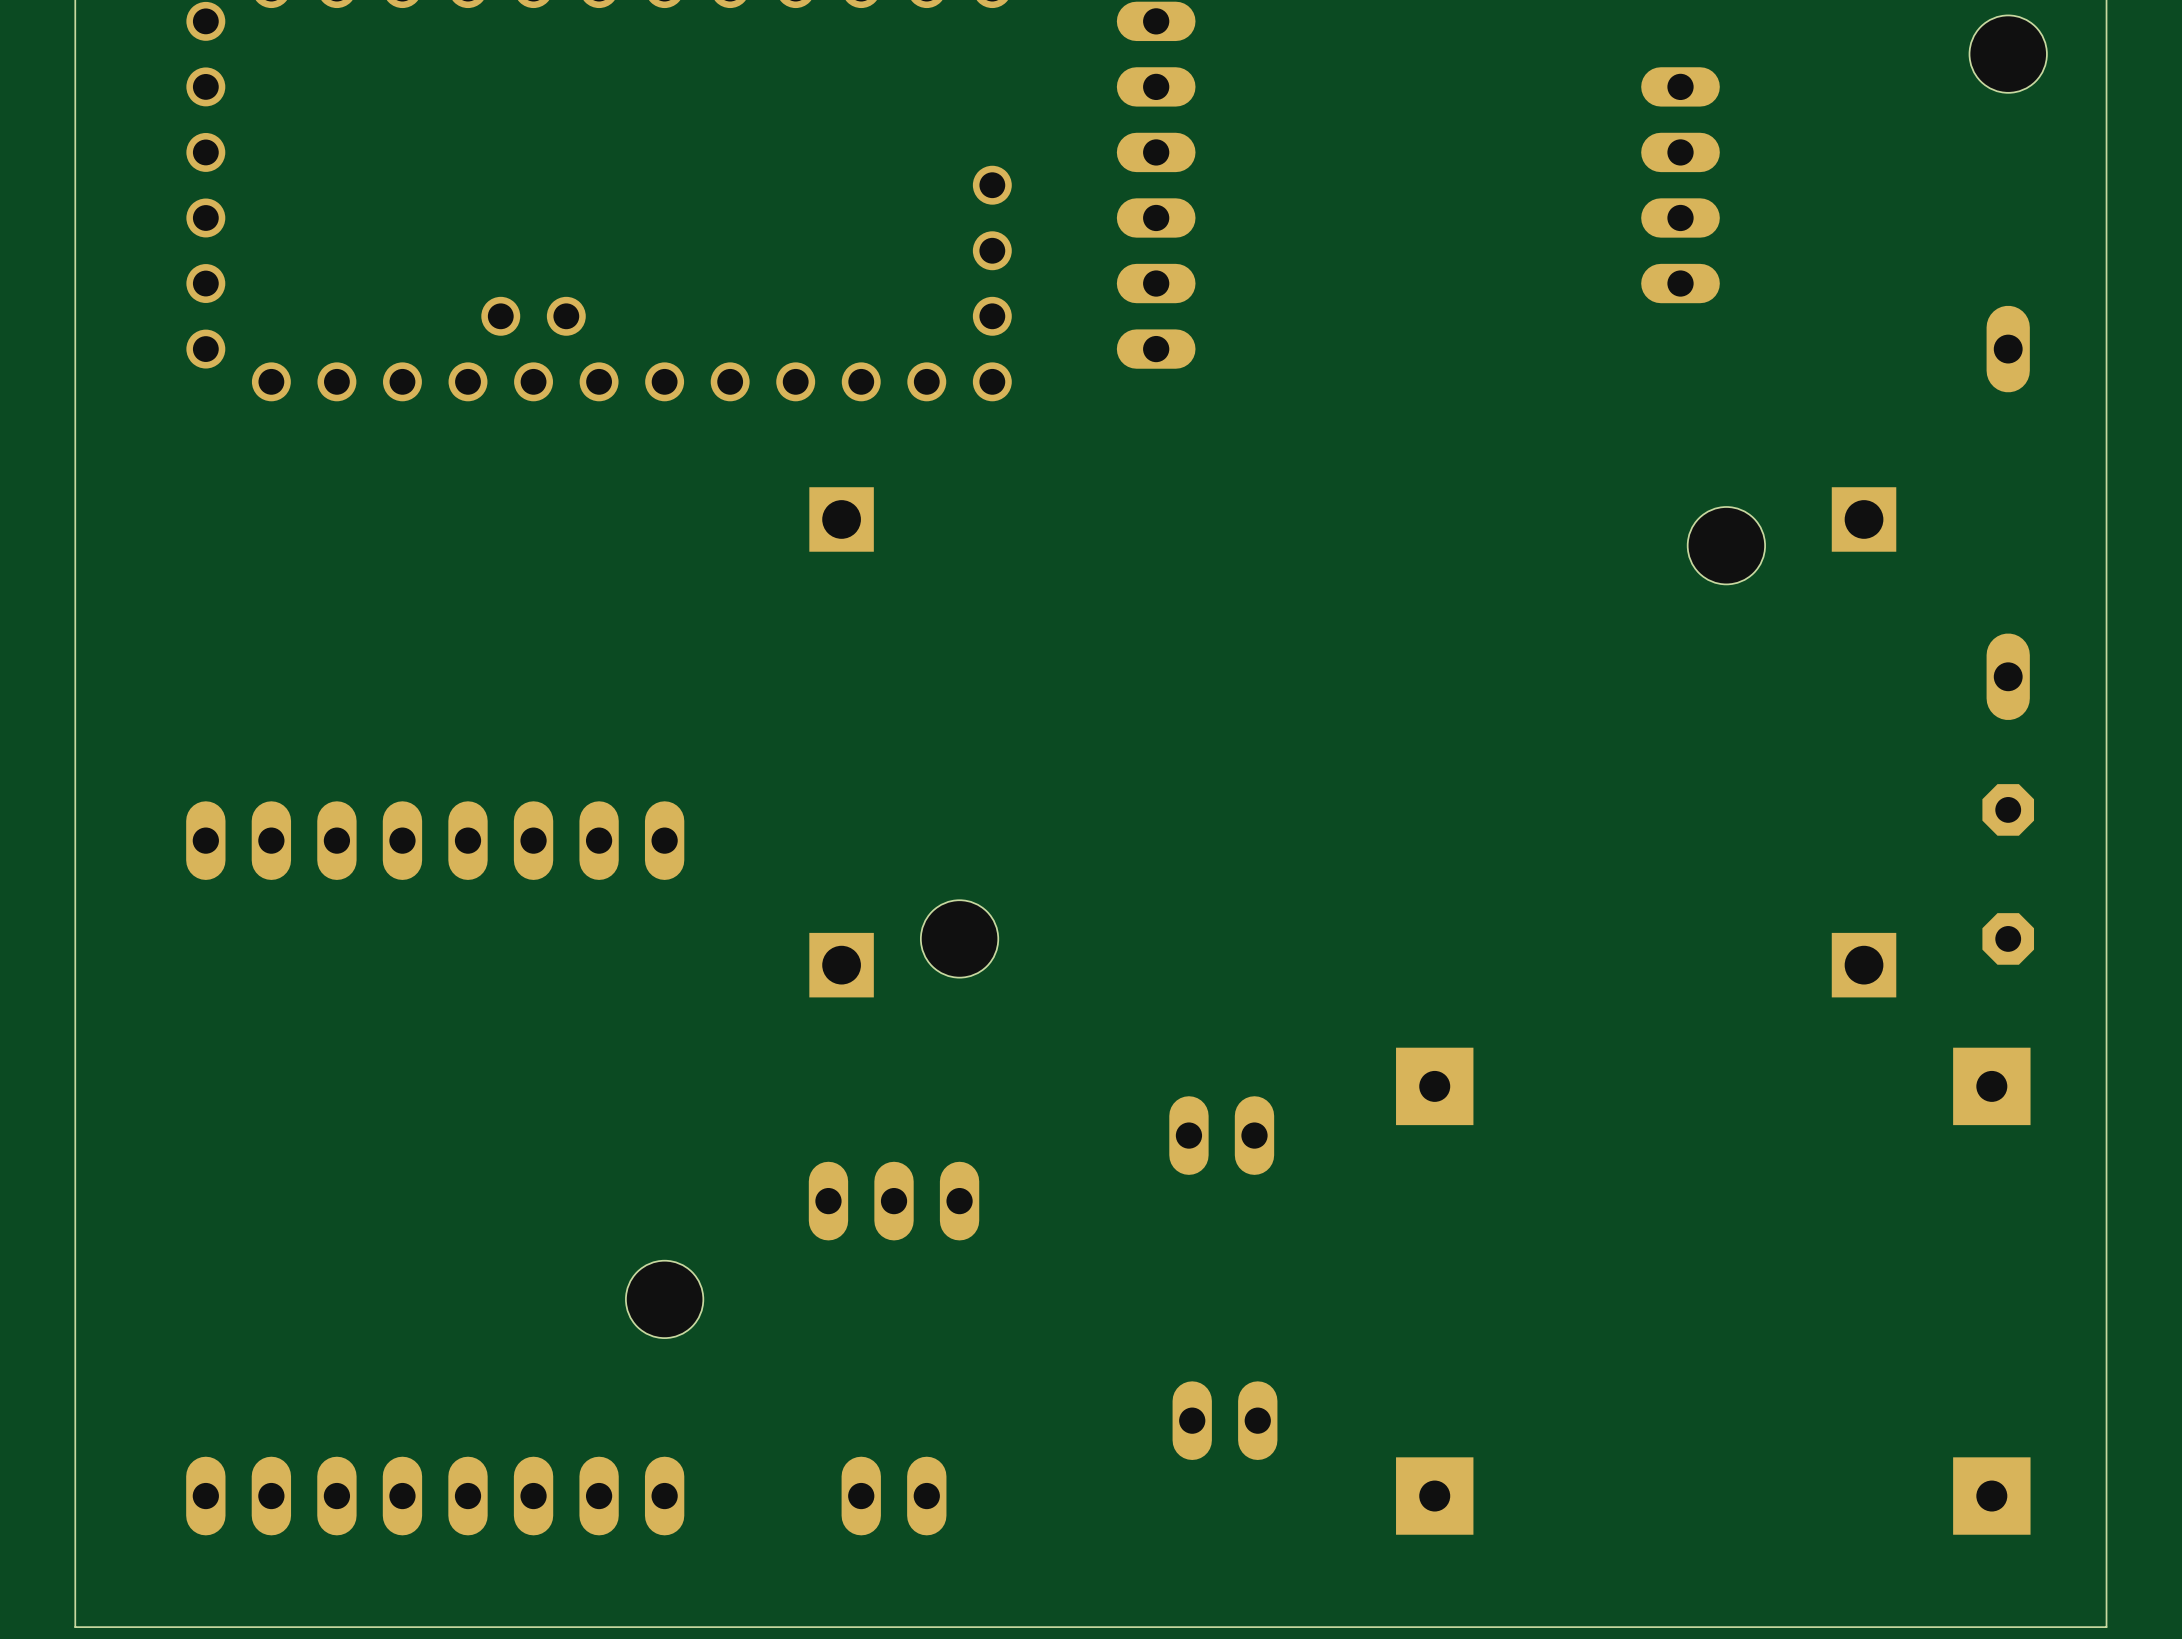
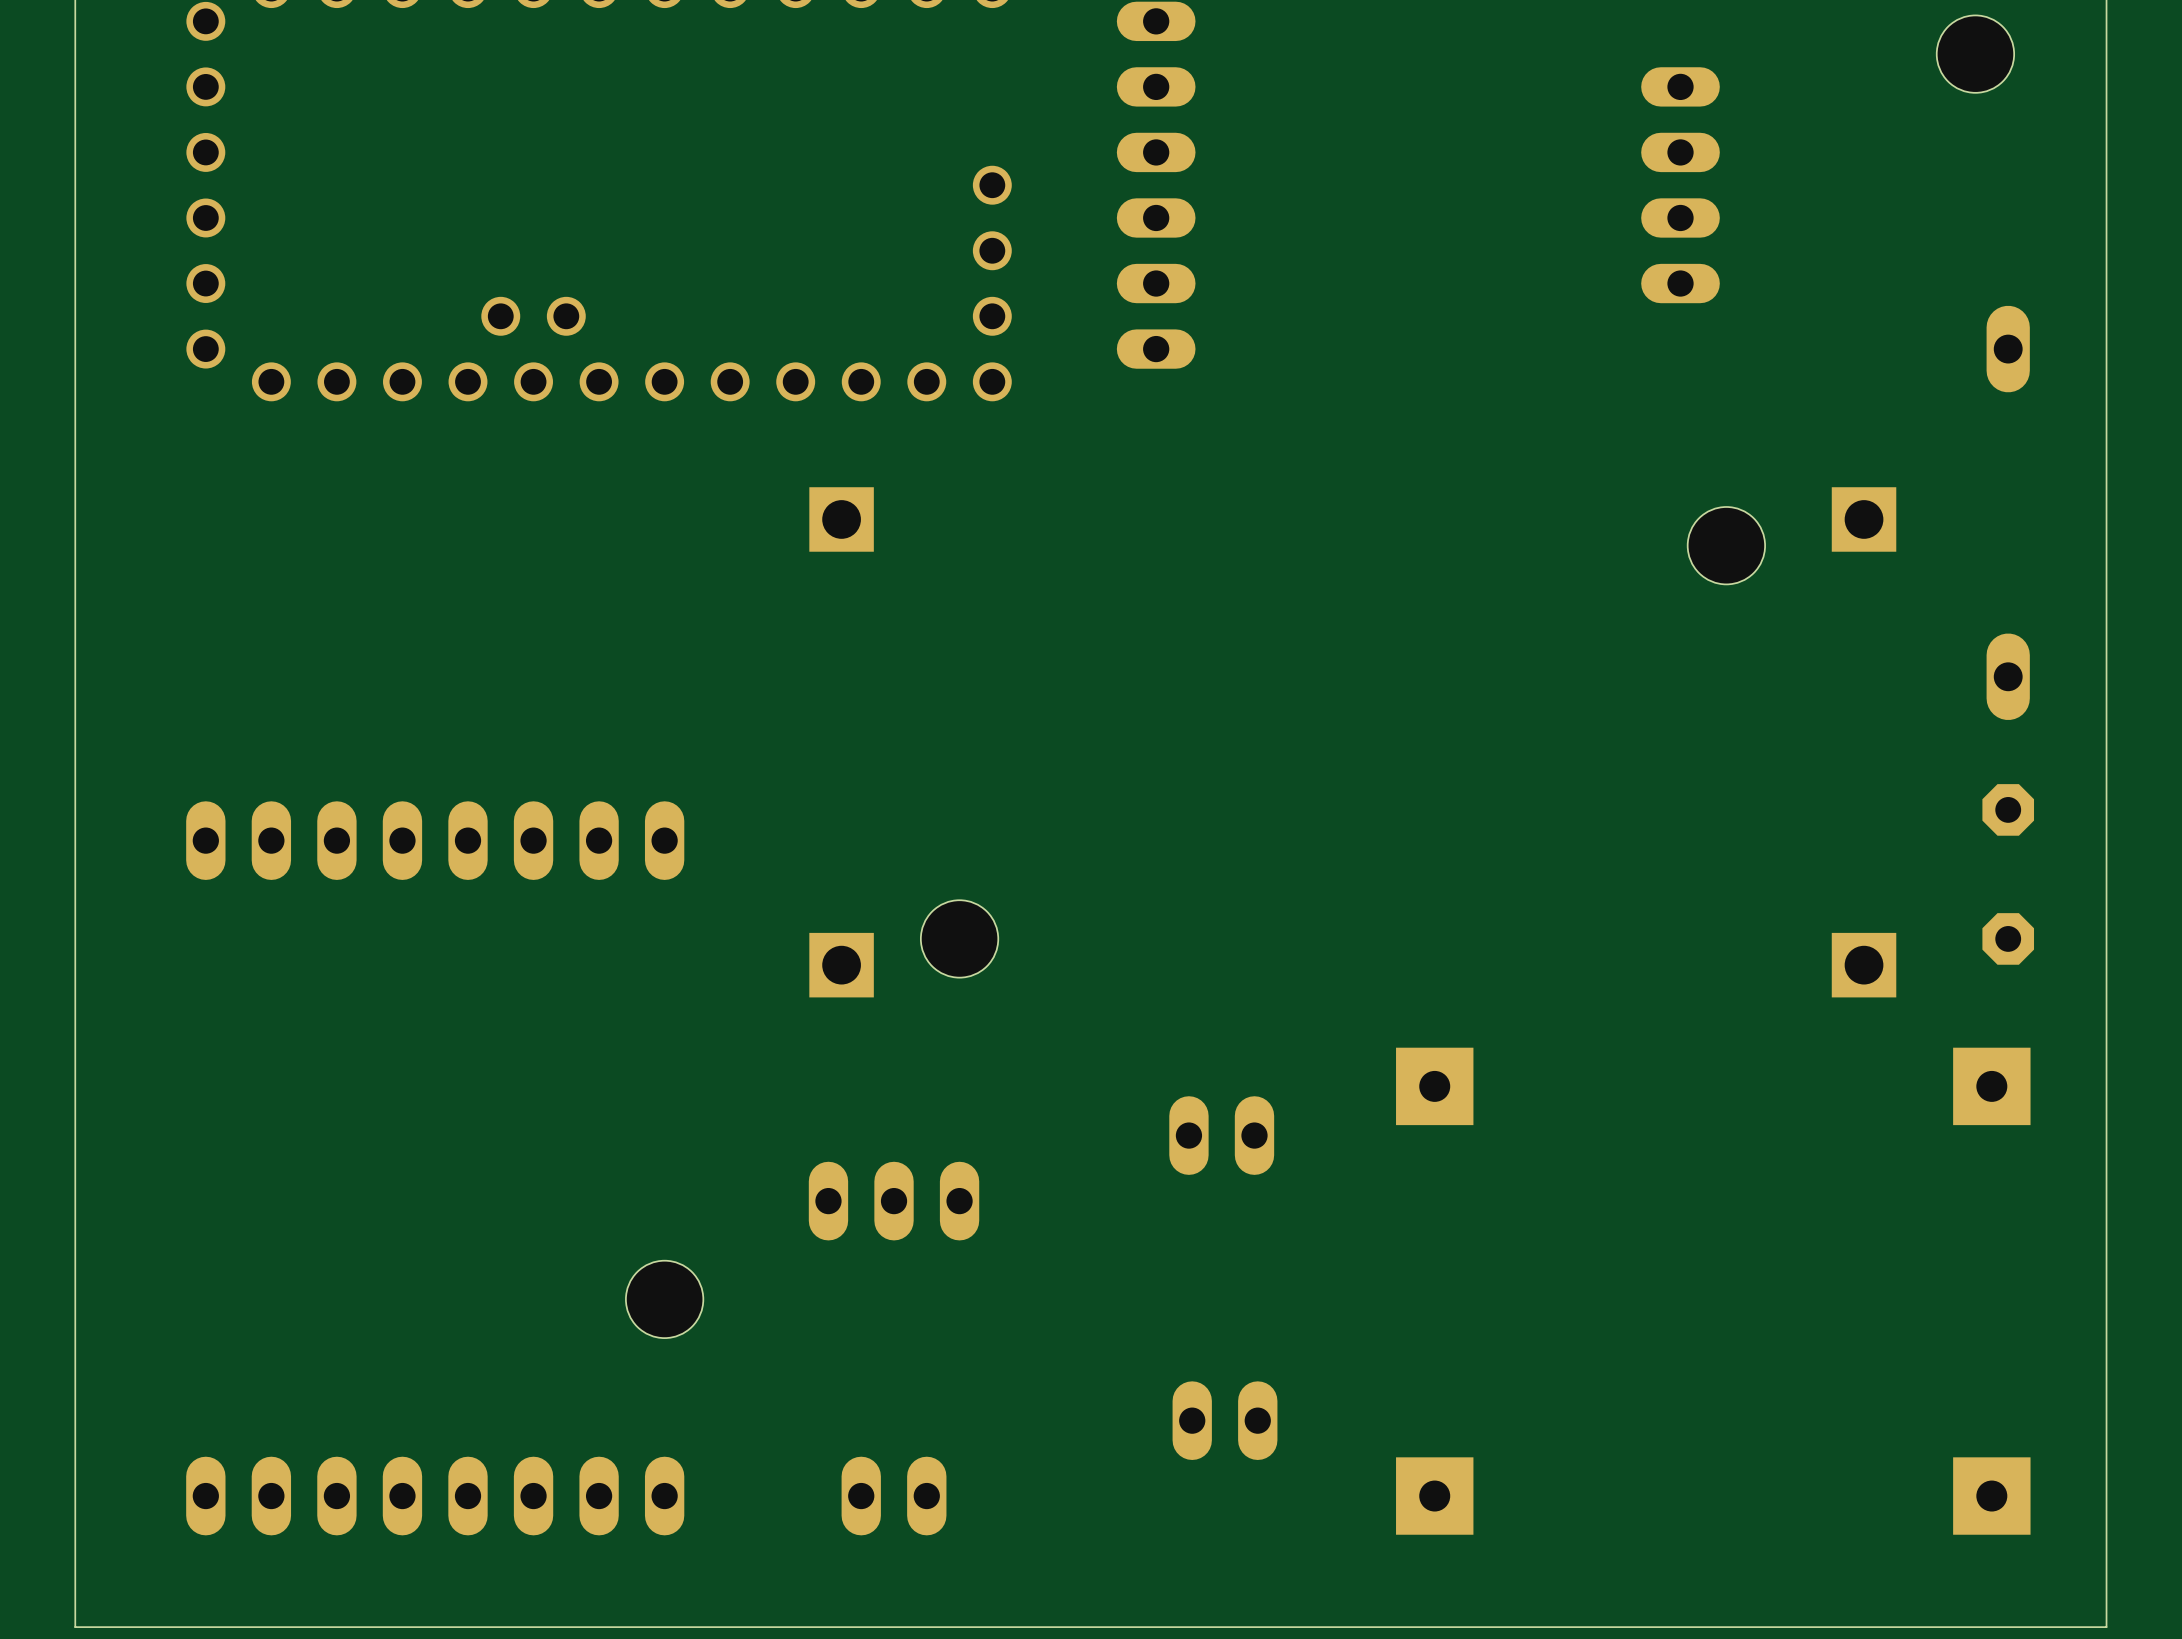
hole position: (2008, 54) -> (1975, 54)

